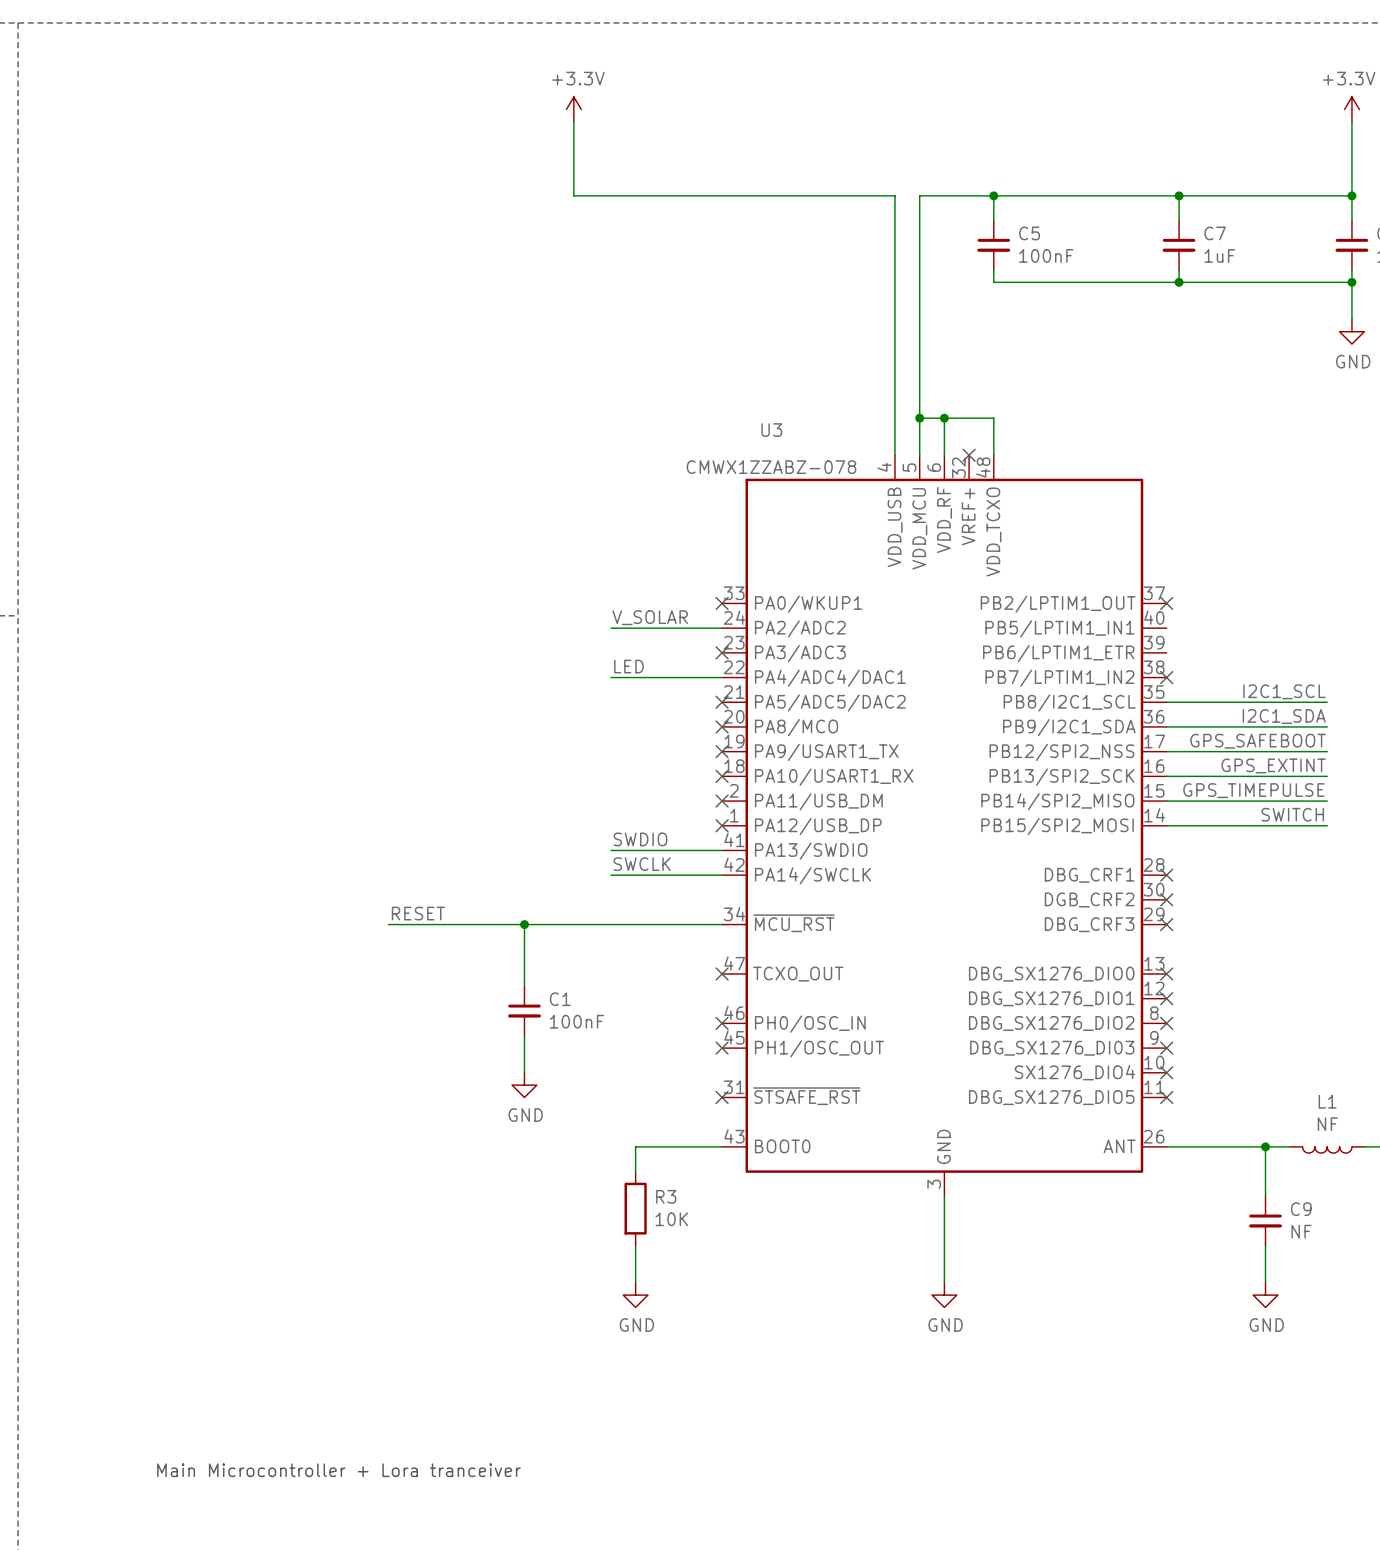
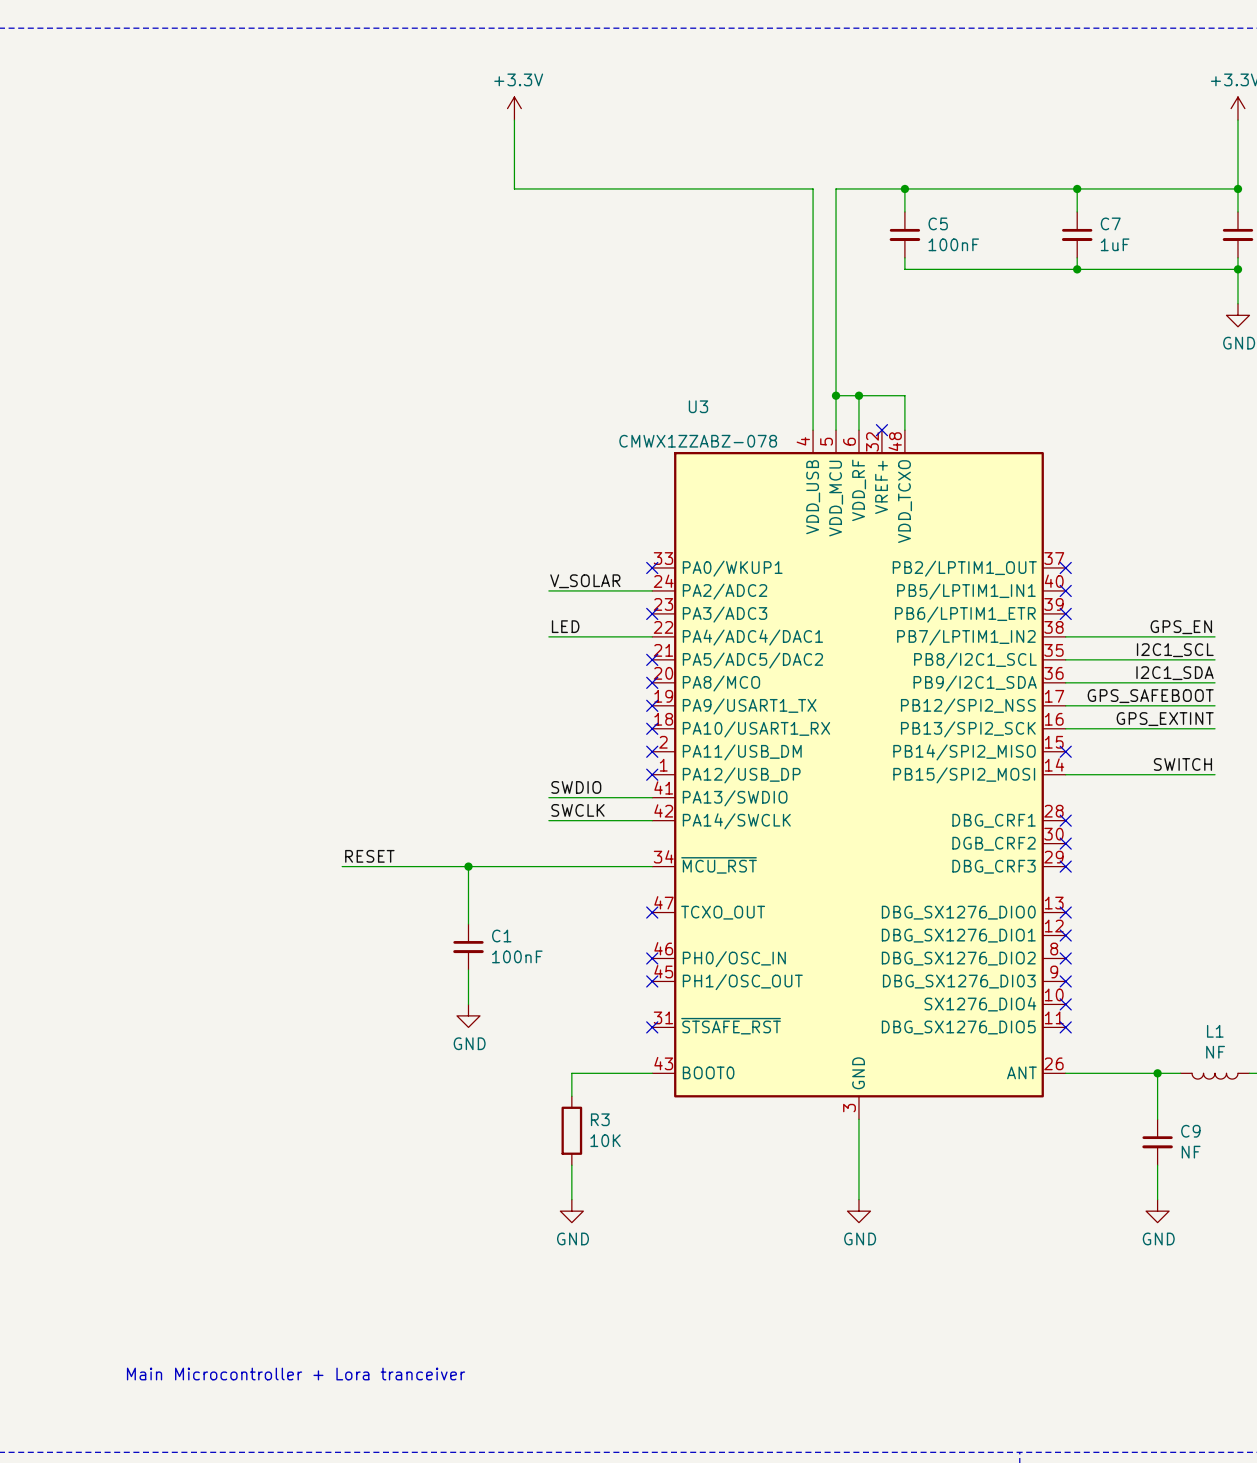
no-connect mark: none -> (1065, 590)
no-connect mark: none -> (1065, 613)
label: none -> GPS_EN (1181, 627)
no-connect mark: (1166, 677) -> none
label: GPS_TIMEPULSE (1253, 790) -> none
wire: (1166, 801) (1327, 801) -> (1065, 636) (1215, 636)
no-connect mark: none -> (1065, 751)

